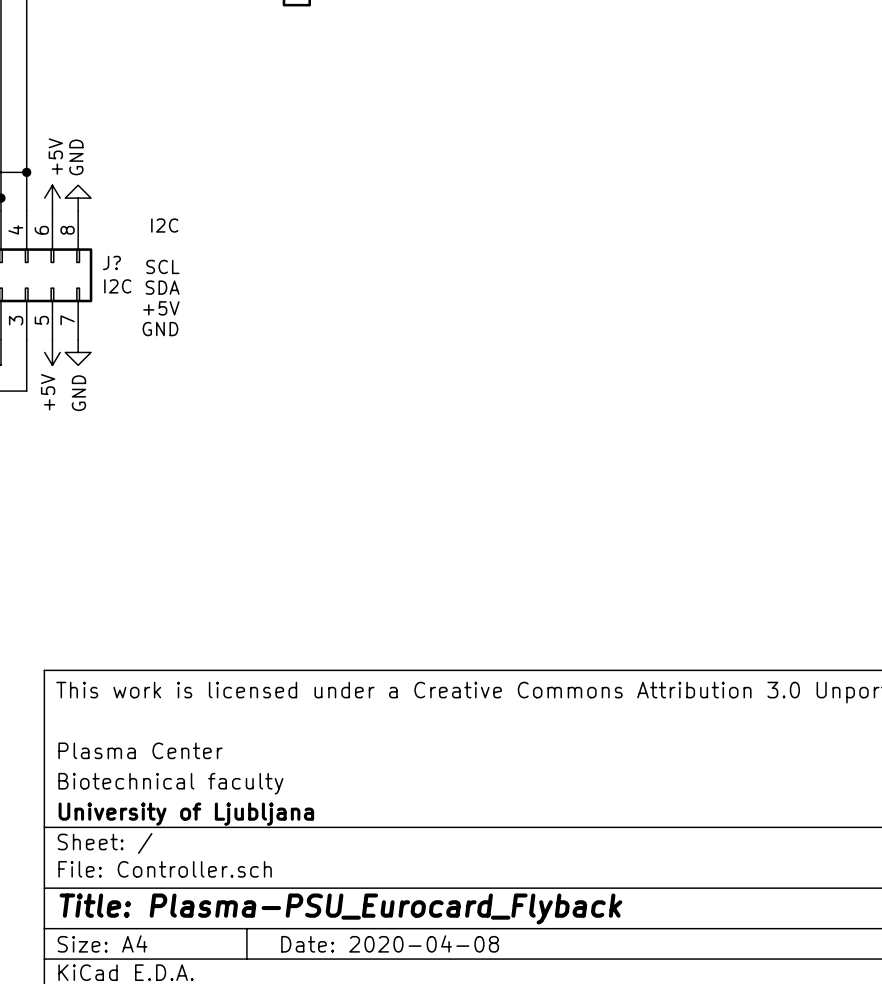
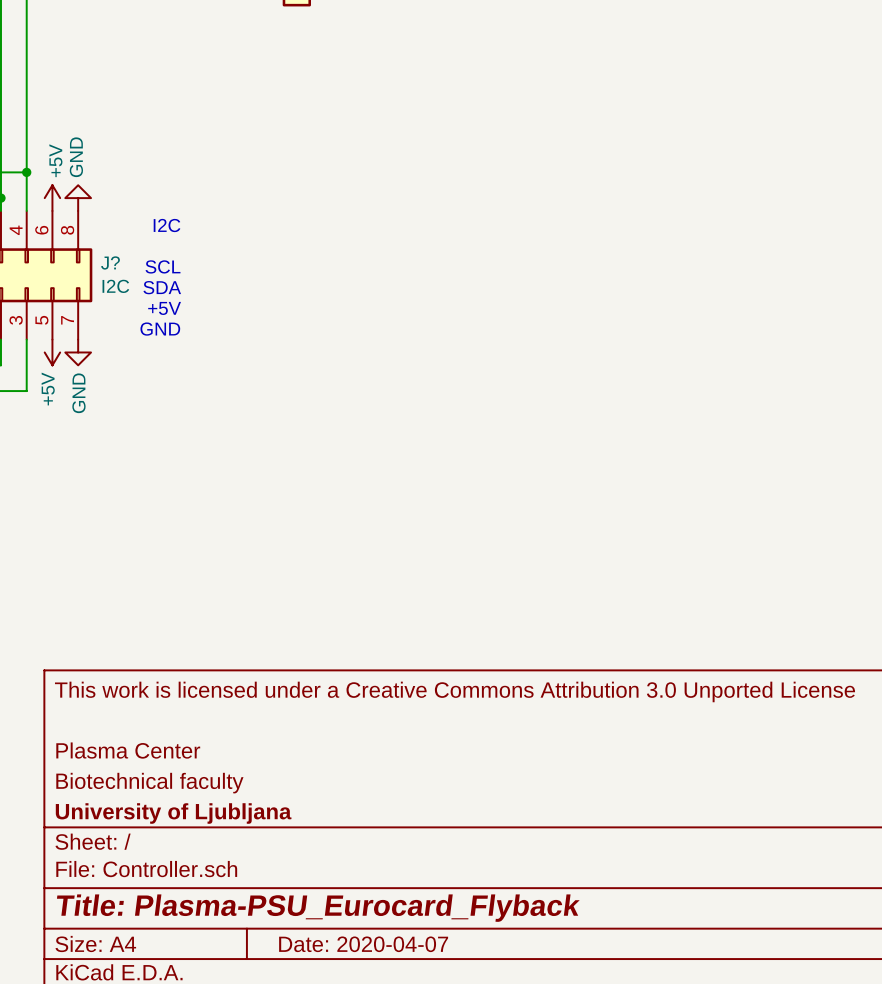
title block: Date: 2020-04-08 (390, 943) -> Date: 2020-04-07 (363, 944)

